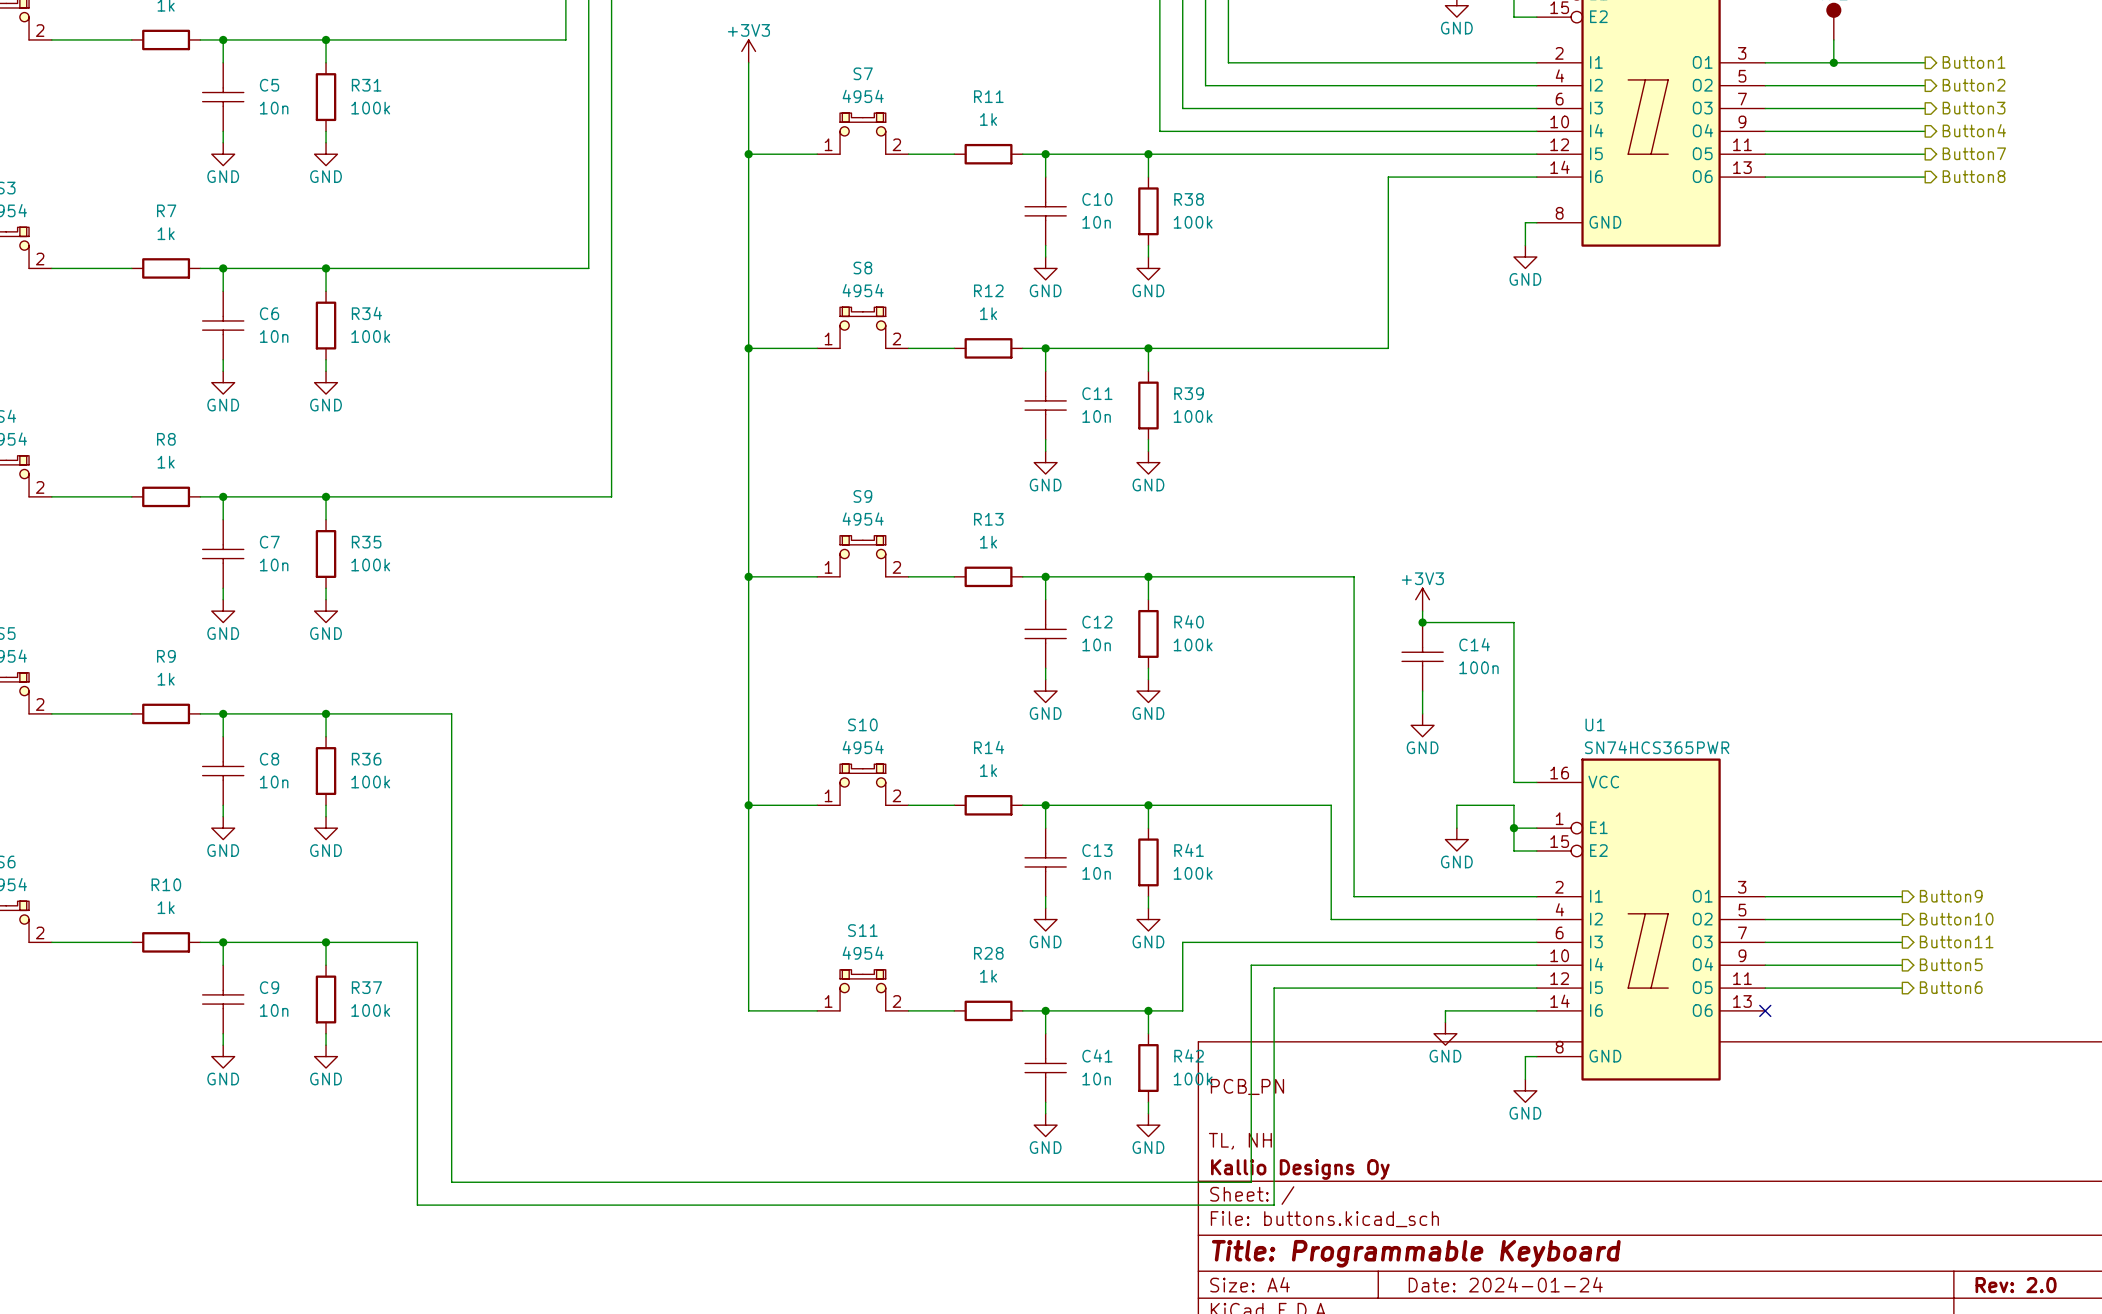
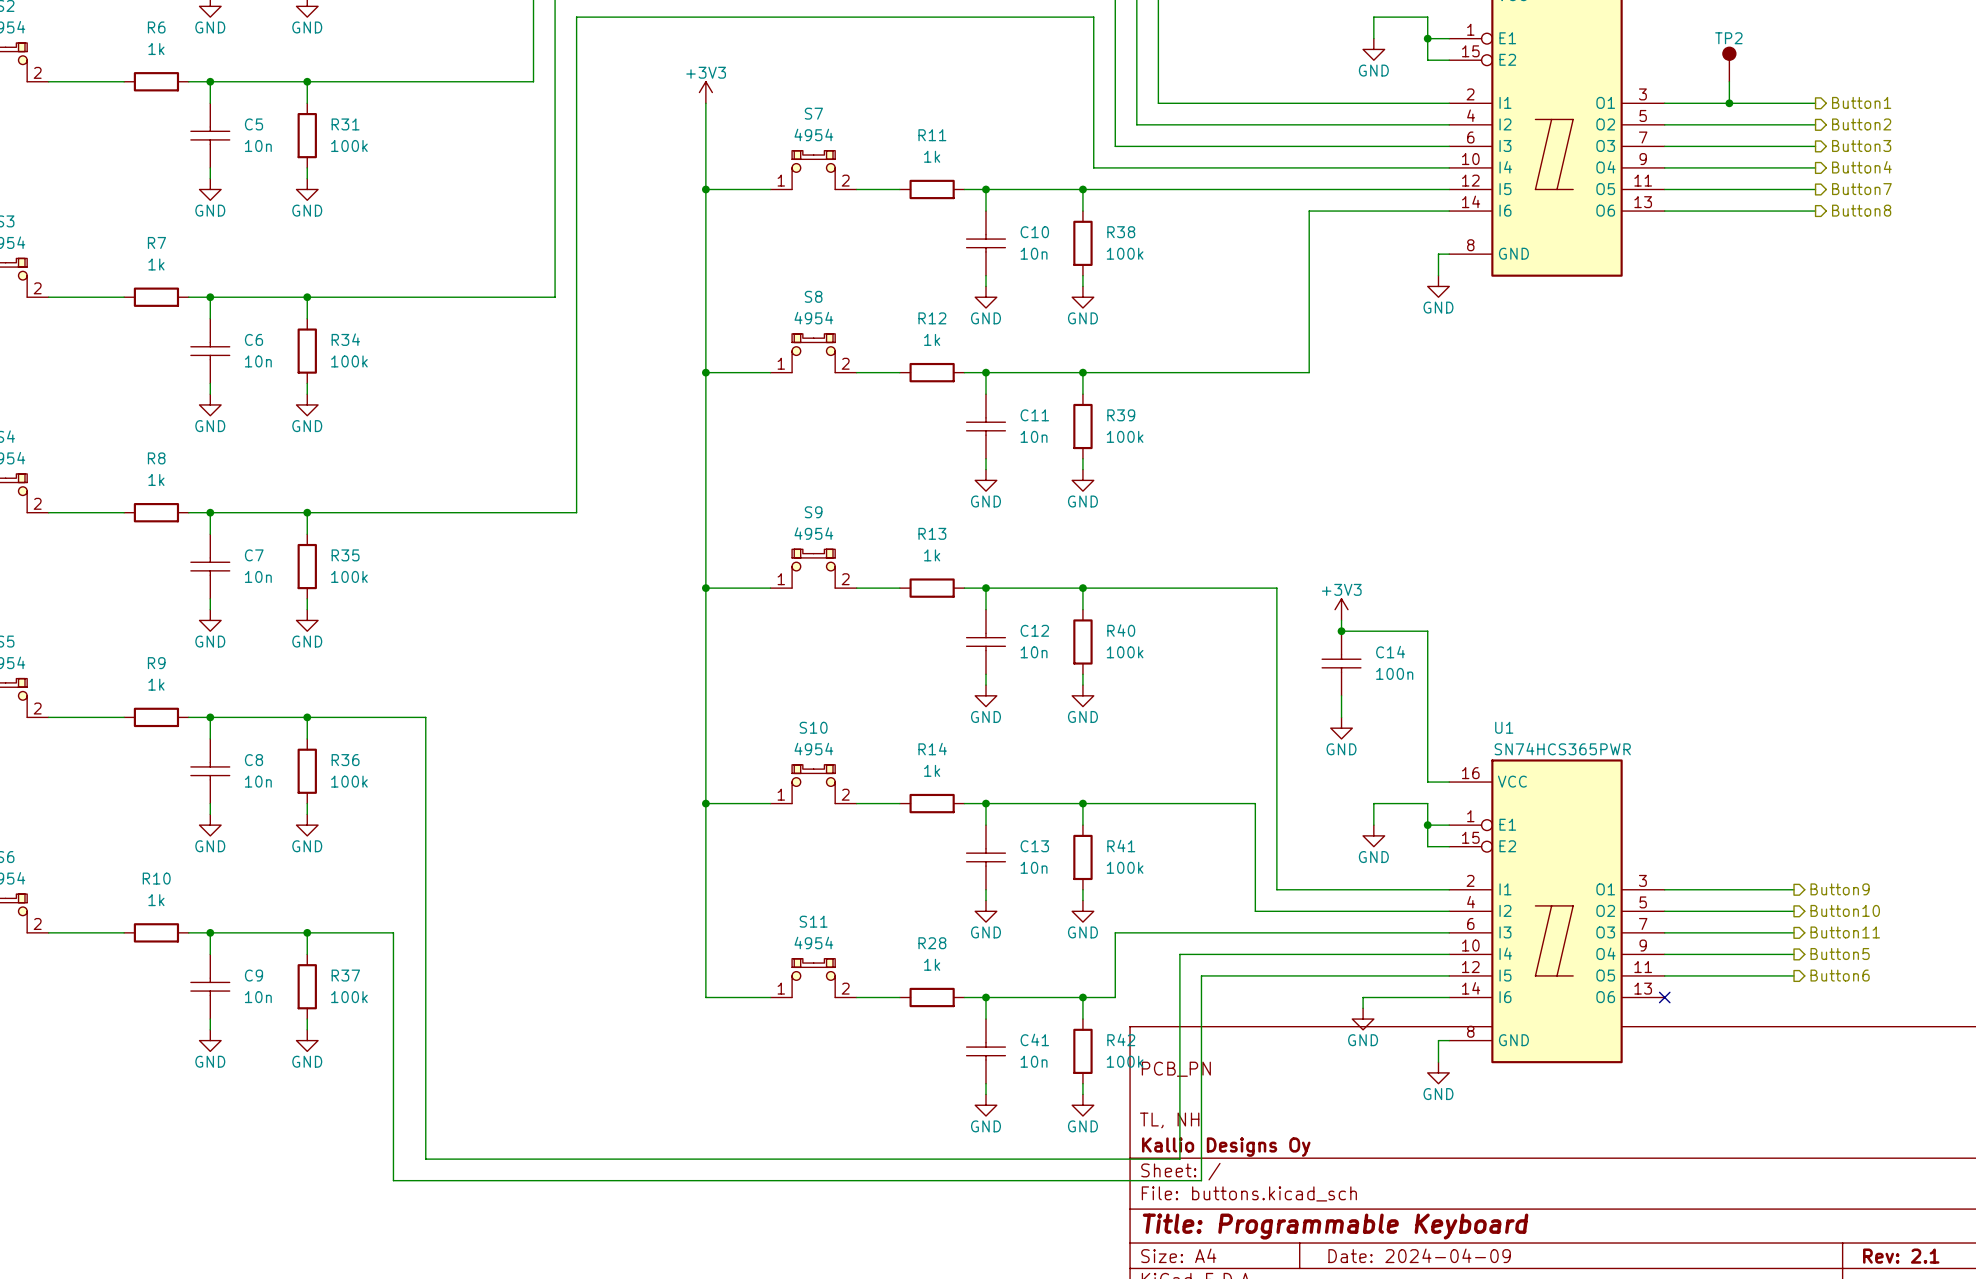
title block: Date: 2024-01-24 (1505, 1284) -> Date: 2024-04-09 (1419, 1255)
title block: Rev: 2.0 (2016, 1285) -> Rev: 2.1 (1901, 1256)

